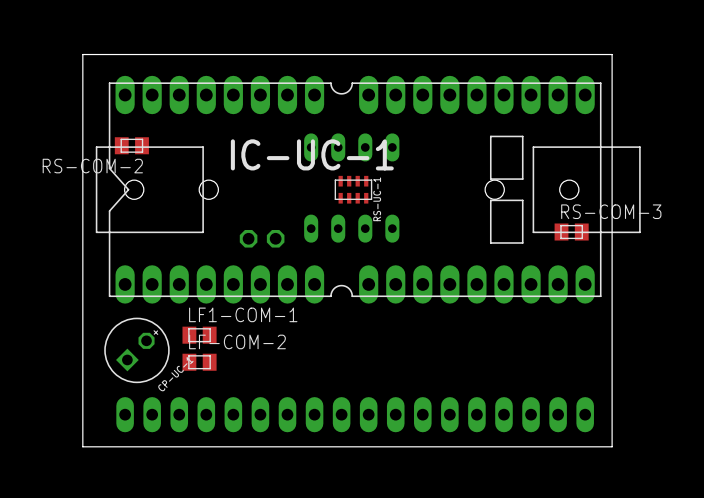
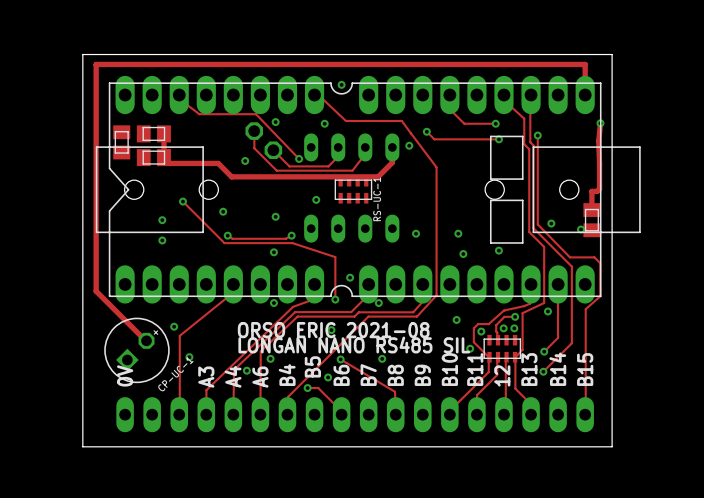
via: none -> (341, 84)
track: none -> (179, 91) (185, 103) (199, 114) (256, 114) (299, 158)
track: none -> (314, 91) (345, 120) (401, 120) (410, 133)
track: none -> (449, 91) (449, 108) (464, 123) (495, 123)
track: none -> (503, 91) (504, 101) (524, 118) (524, 144) (529, 149) (529, 231) (544, 246) (544, 302) (522, 313) (522, 349) (515, 357) (515, 388) (530, 403) (531, 411)
track: none -> (531, 91) (530, 142) (533, 145) (533, 228) (571, 266) (571, 343) (543, 371)
track: none -> (585, 91) (585, 64) (96, 64) (96, 291) (142, 337) (146, 337)
via: none -> (275, 122)
via: none -> (324, 123)
via: none -> (495, 123)
track: none -> (600, 123) (599, 188) (597, 191) (591, 191) (591, 210)
via: none -> (600, 123)
track: none -> (254, 131) (254, 148) (276, 170) (352, 170) (364, 155) (365, 144)
track: none -> (426, 131) (434, 139) (498, 139)
via: none -> (426, 131)
part: none -> (153, 133)
track: none -> (163, 133) (163, 157) (169, 163) (218, 163) (231, 176) (378, 176) (392, 162) (392, 144)
track: none -> (410, 133) (436, 167) (436, 295) (417, 316) (368, 316) (288, 396) (287, 411)
track: none -> (537, 135) (537, 224) (569, 257) (594, 257) (600, 263) (600, 296) (585, 309) (585, 411)
via: none -> (537, 135)
via: none -> (498, 139)
part: none -> (263, 140)
part: none -> (121, 142)
track: none -> (338, 144) (337, 156) (328, 166) (289, 166) (273, 150)
RS-COM-2: (131, 145) -> none
via: none -> (409, 145)
IC-UC-1 name: IC-UC-1 (312, 154) -> none
part: none -> (153, 157)
via: none -> (299, 158)
via: none -> (245, 160)
via: none -> (316, 199)
track: none -> (182, 201) (224, 243) (292, 243) (335, 257) (335, 299)
via: none -> (182, 201)
via: none -> (223, 211)
via: none -> (275, 216)
via: none -> (162, 220)
part: none -> (591, 220)
via: none -> (551, 223)
via: none -> (581, 229)
RS-COM-3: (571, 232) -> none
via: none -> (416, 233)
via: none -> (458, 233)
track: none -> (227, 235) (232, 238) (285, 238) (291, 235)
via: none -> (227, 235)
via: none -> (291, 235)
part: (262, 238) -> none
via: none -> (162, 240)
via: none -> (498, 250)
via: none -> (273, 252)
via: none -> (463, 254)
via: none -> (350, 277)
track: none -> (233, 281) (232, 293) (179, 335) (179, 411)
track: none -> (314, 281) (312, 282) (312, 299) (293, 306) (206, 390) (206, 411)
track: none -> (368, 281) (368, 295) (351, 312) (295, 312) (234, 369) (233, 411)
track: none -> (422, 281) (427, 296) (413, 312) (358, 312) (354, 316) (297, 316) (260, 351) (260, 411)
track: none -> (531, 281) (530, 303) (504, 310) (488, 324) (478, 324) (473, 328) (473, 342) (489, 357) (488, 372) (449, 411)
track: none -> (558, 281) (558, 337) (544, 351)
via: none -> (335, 299)
via: none -> (273, 303)
via: none -> (378, 303)
via: none -> (547, 311)
track: none -> (515, 316) (504, 316) (496, 325) (498, 340)
via: none -> (515, 316)
via: none -> (456, 319)
via: none -> (174, 326)
via: none -> (503, 328)
via: none -> (514, 328)
via: none -> (331, 330)
text: none -> ORSO ERIC 2021-08 (333, 330)
via: none -> (481, 331)
LF1-COM-1: (199, 335) -> none
text: none -> LONGAN NANO RS485 SIL (354, 345)
via: none -> (470, 348)
part: none -> (502, 348)
via: none -> (544, 351)
via: none -> (189, 357)
track: none -> (498, 357) (497, 374) (477, 395) (476, 411)
track: none -> (506, 357) (505, 409) (503, 411)
via: none -> (270, 358)
via: none -> (382, 358)
track: none -> (340, 359) (395, 391) (395, 411)
via: none -> (340, 359)
LF-COM-2: (199, 362) -> none
text: none -> B5 (312, 366)
text: none -> B10 (449, 369)
text: none -> B11 (475, 369)
text: none -> B13 (529, 369)
text: none -> B14 (557, 369)
text: none -> B15 (585, 369)
via: none -> (246, 370)
via: none -> (543, 371)
text: none -> 0V (125, 375)
text: none -> B4 (287, 375)
text: none -> B6 (341, 375)
text: none -> B7 (368, 375)
text: none -> B8 (395, 375)
text: none -> B9 (422, 375)
text: none -> 12 (502, 375)
text: none -> A4 (233, 376)
text: none -> A3 (206, 377)
text: none -> A6 (260, 377)
via: none -> (328, 377)
track: none -> (307, 388) (318, 388) (341, 411)
via: none -> (307, 388)

